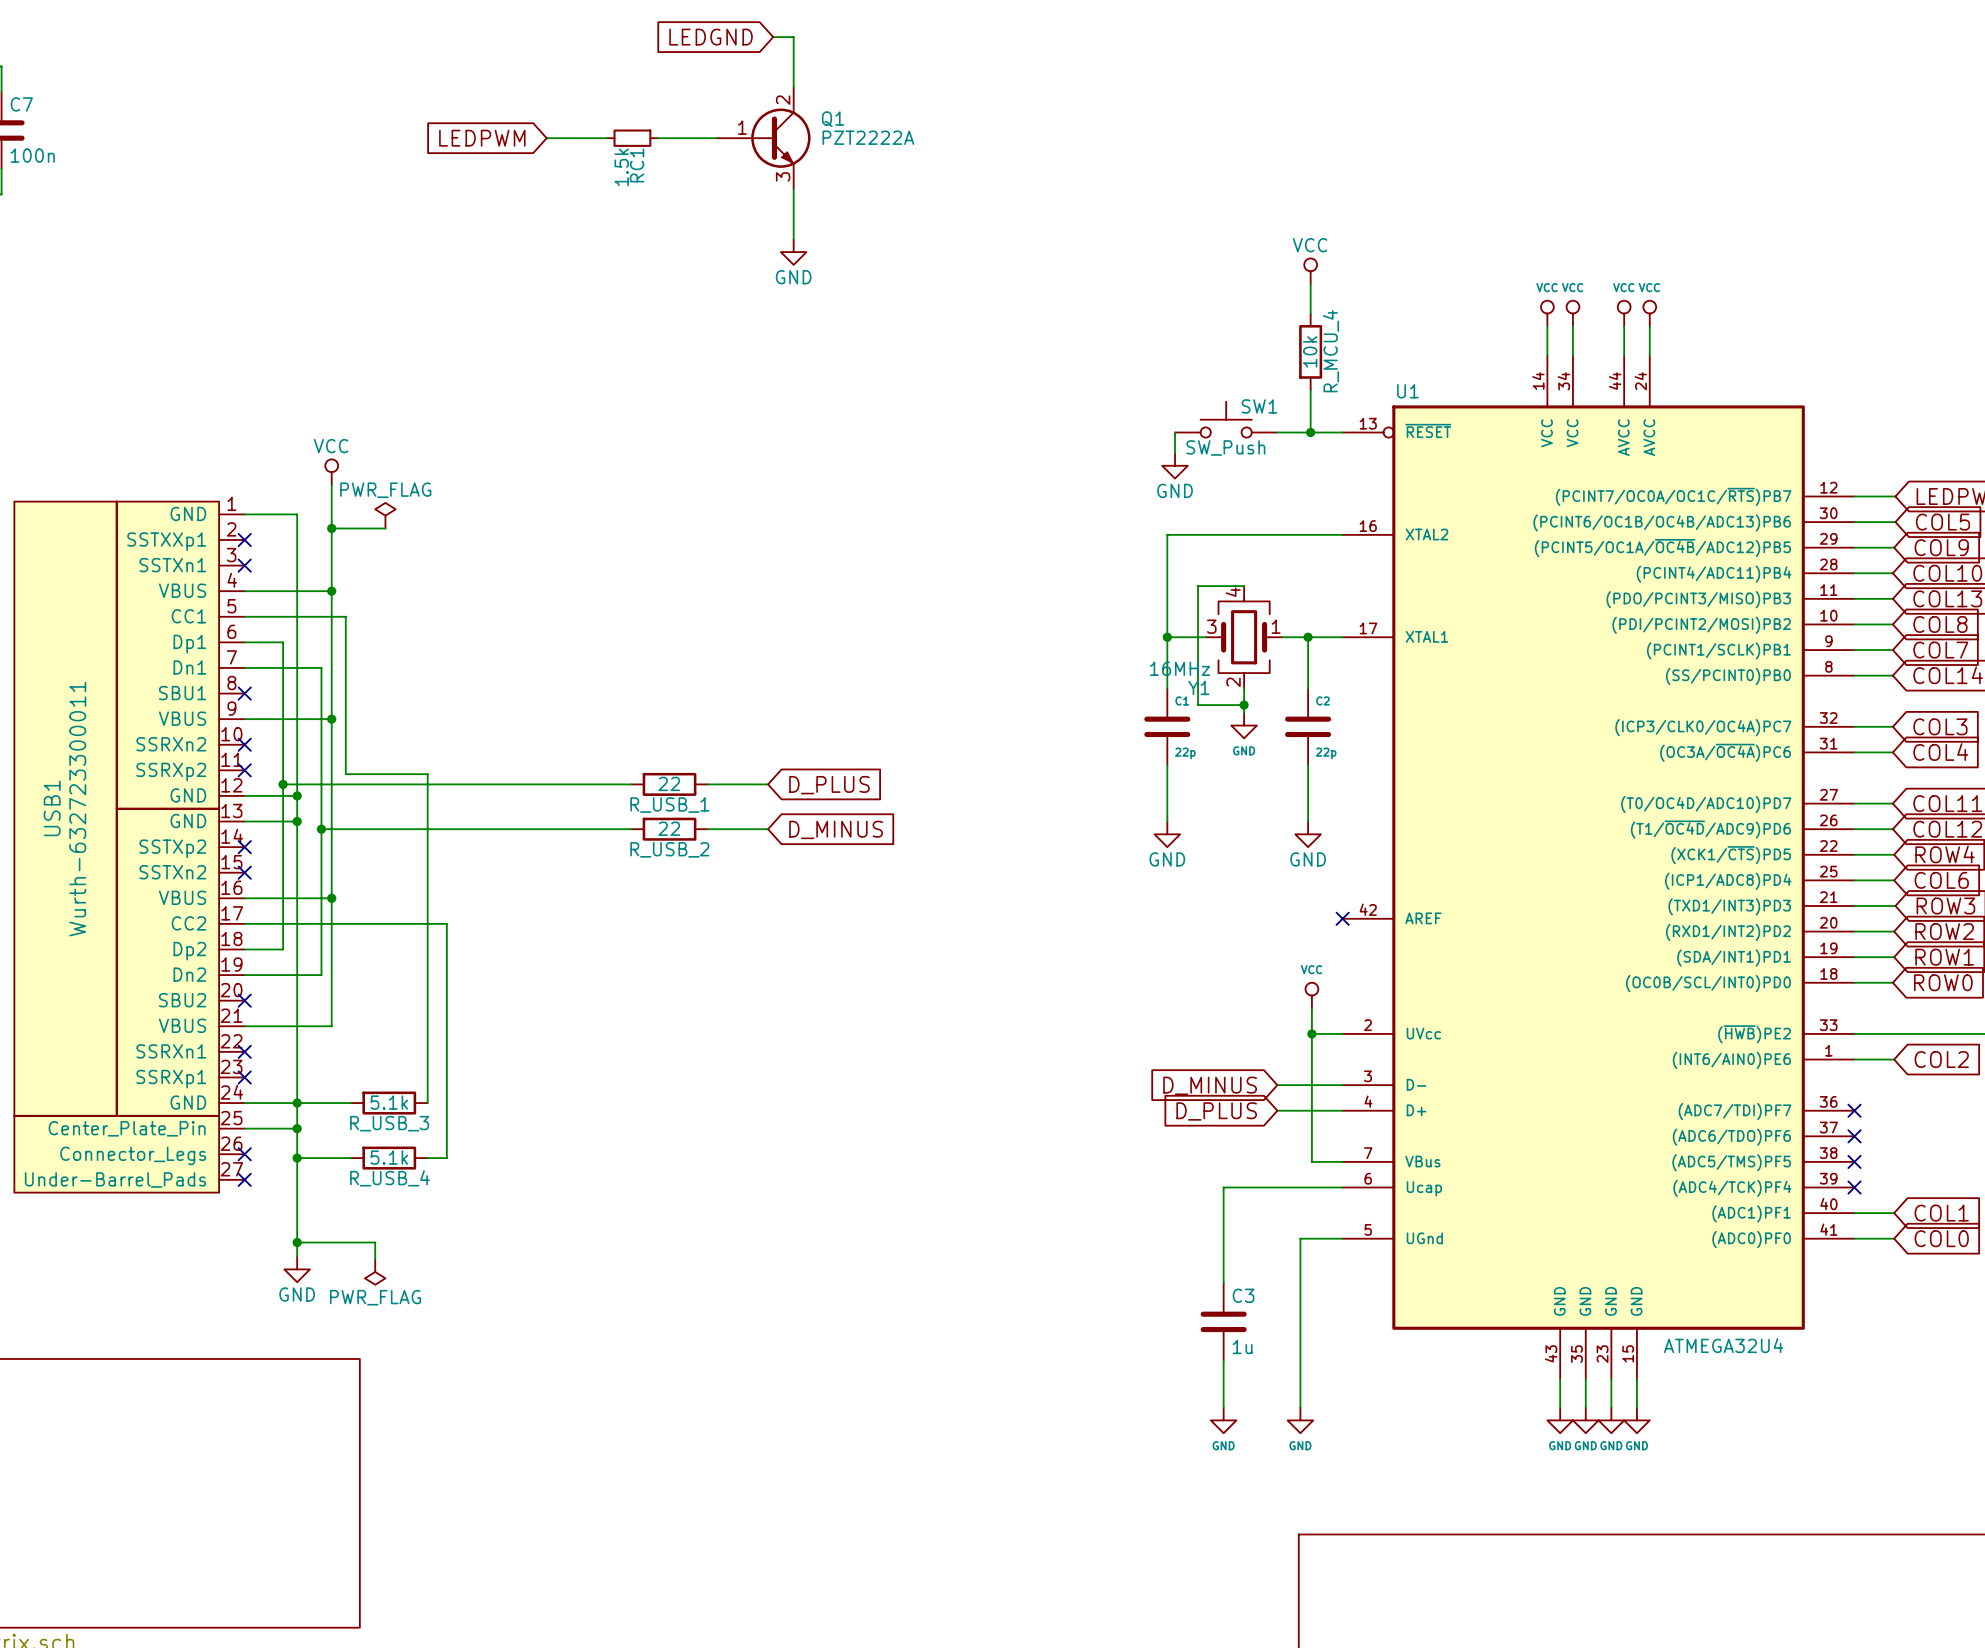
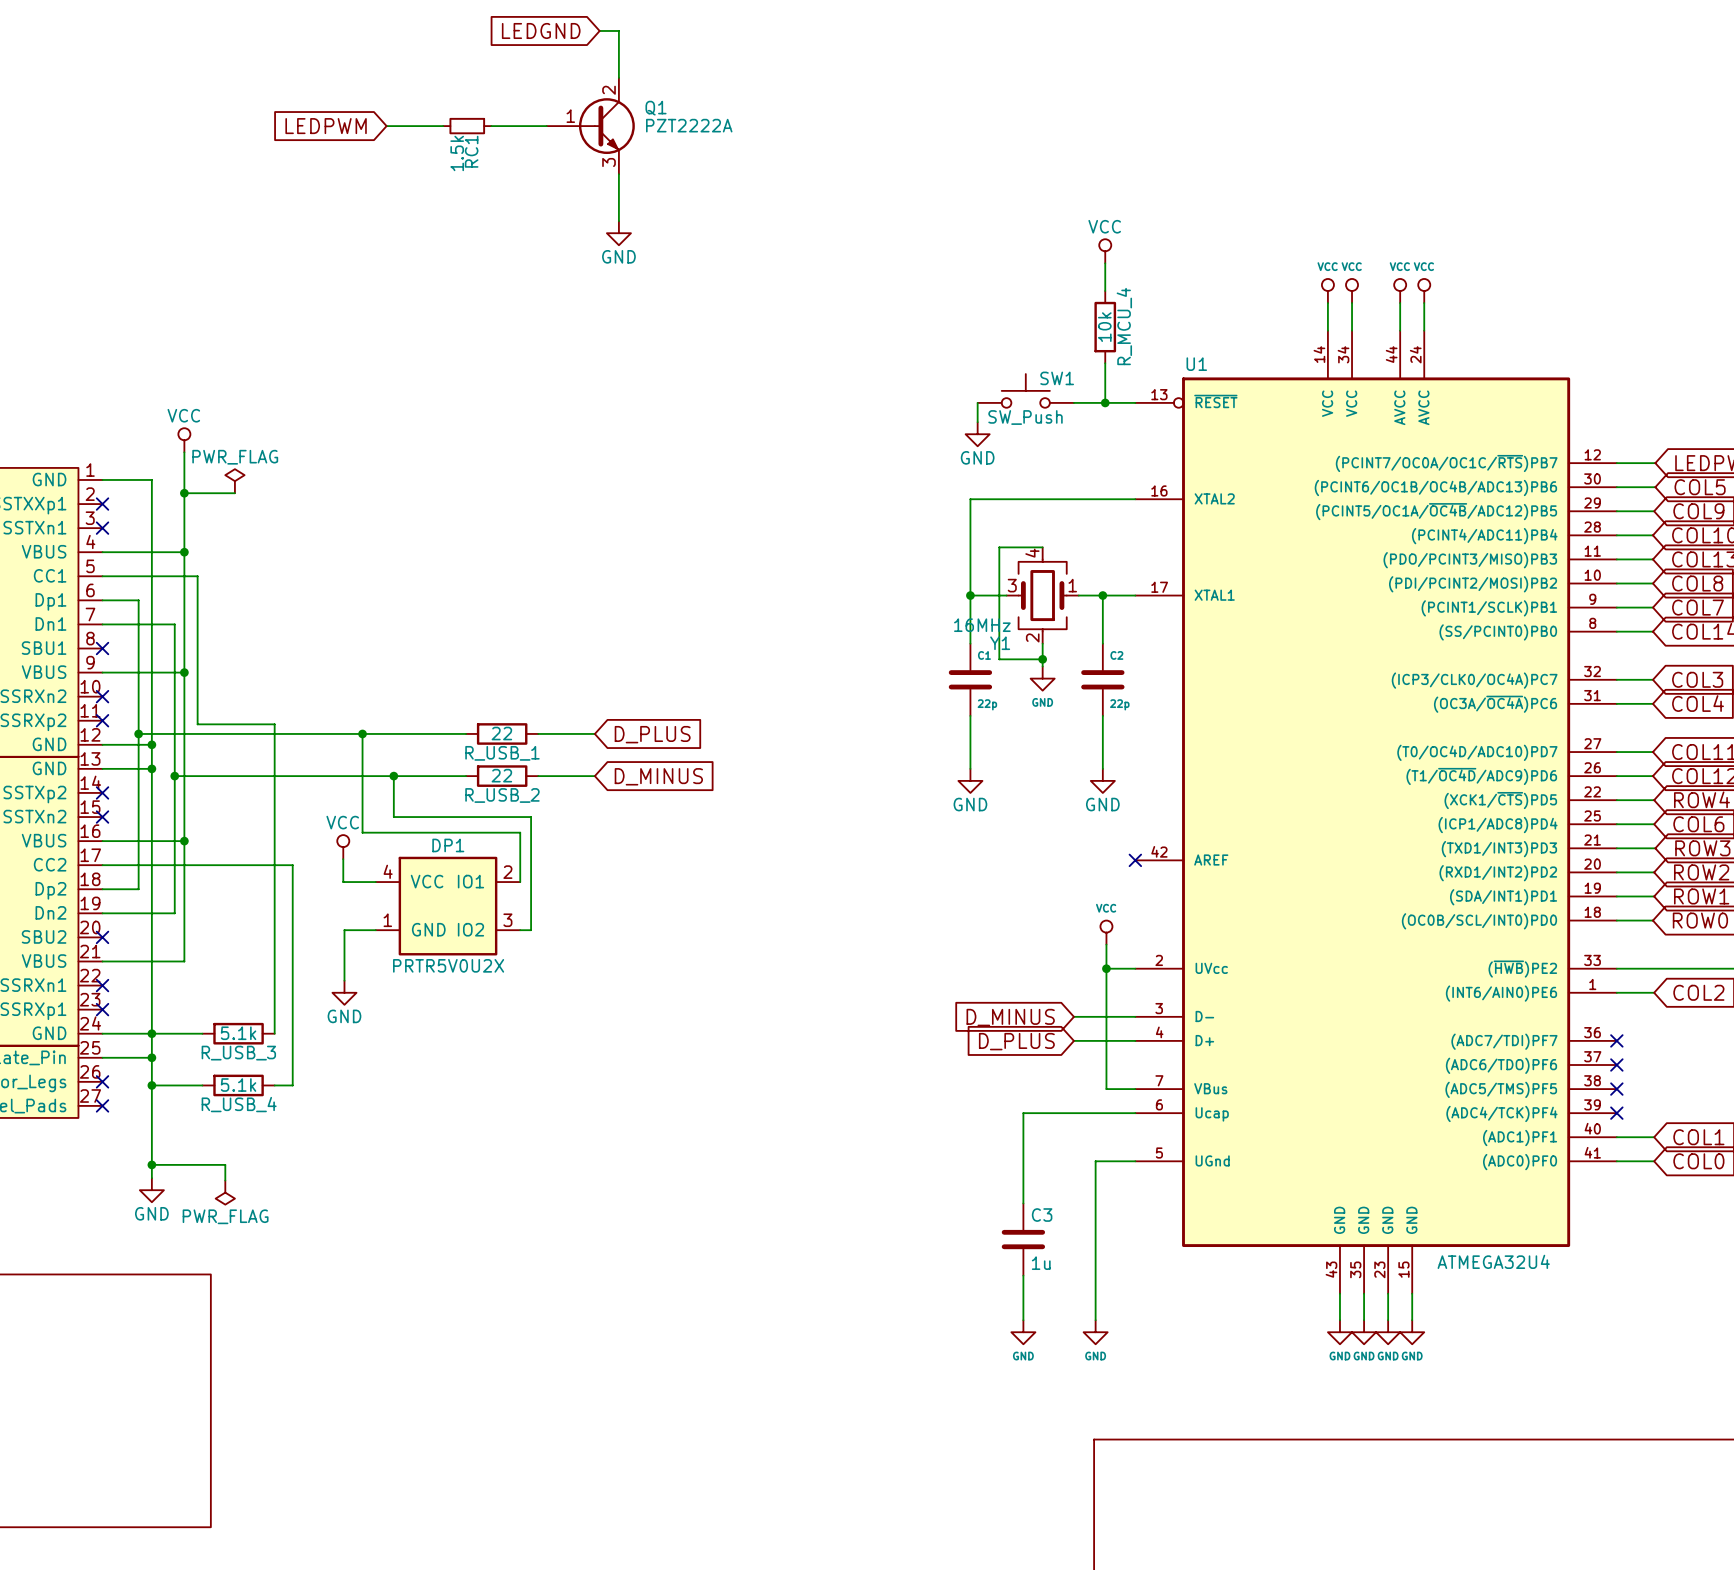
wire: none -> (362, 733) (362, 832) (520, 832) (520, 882)
junction: none -> (362, 733)
wire: none -> (393, 776) (393, 817) (531, 817) (531, 930) (520, 930)
junction: none -> (393, 776)
power symbol: none -> VCC (343, 847)
wire: none -> (343, 859) (343, 882) (375, 882)
DP1: none -> PRTR5V0U2X (448, 906)
wire: none -> (375, 930) (344, 930) (344, 980)
power symbol: none -> GND (344, 992)

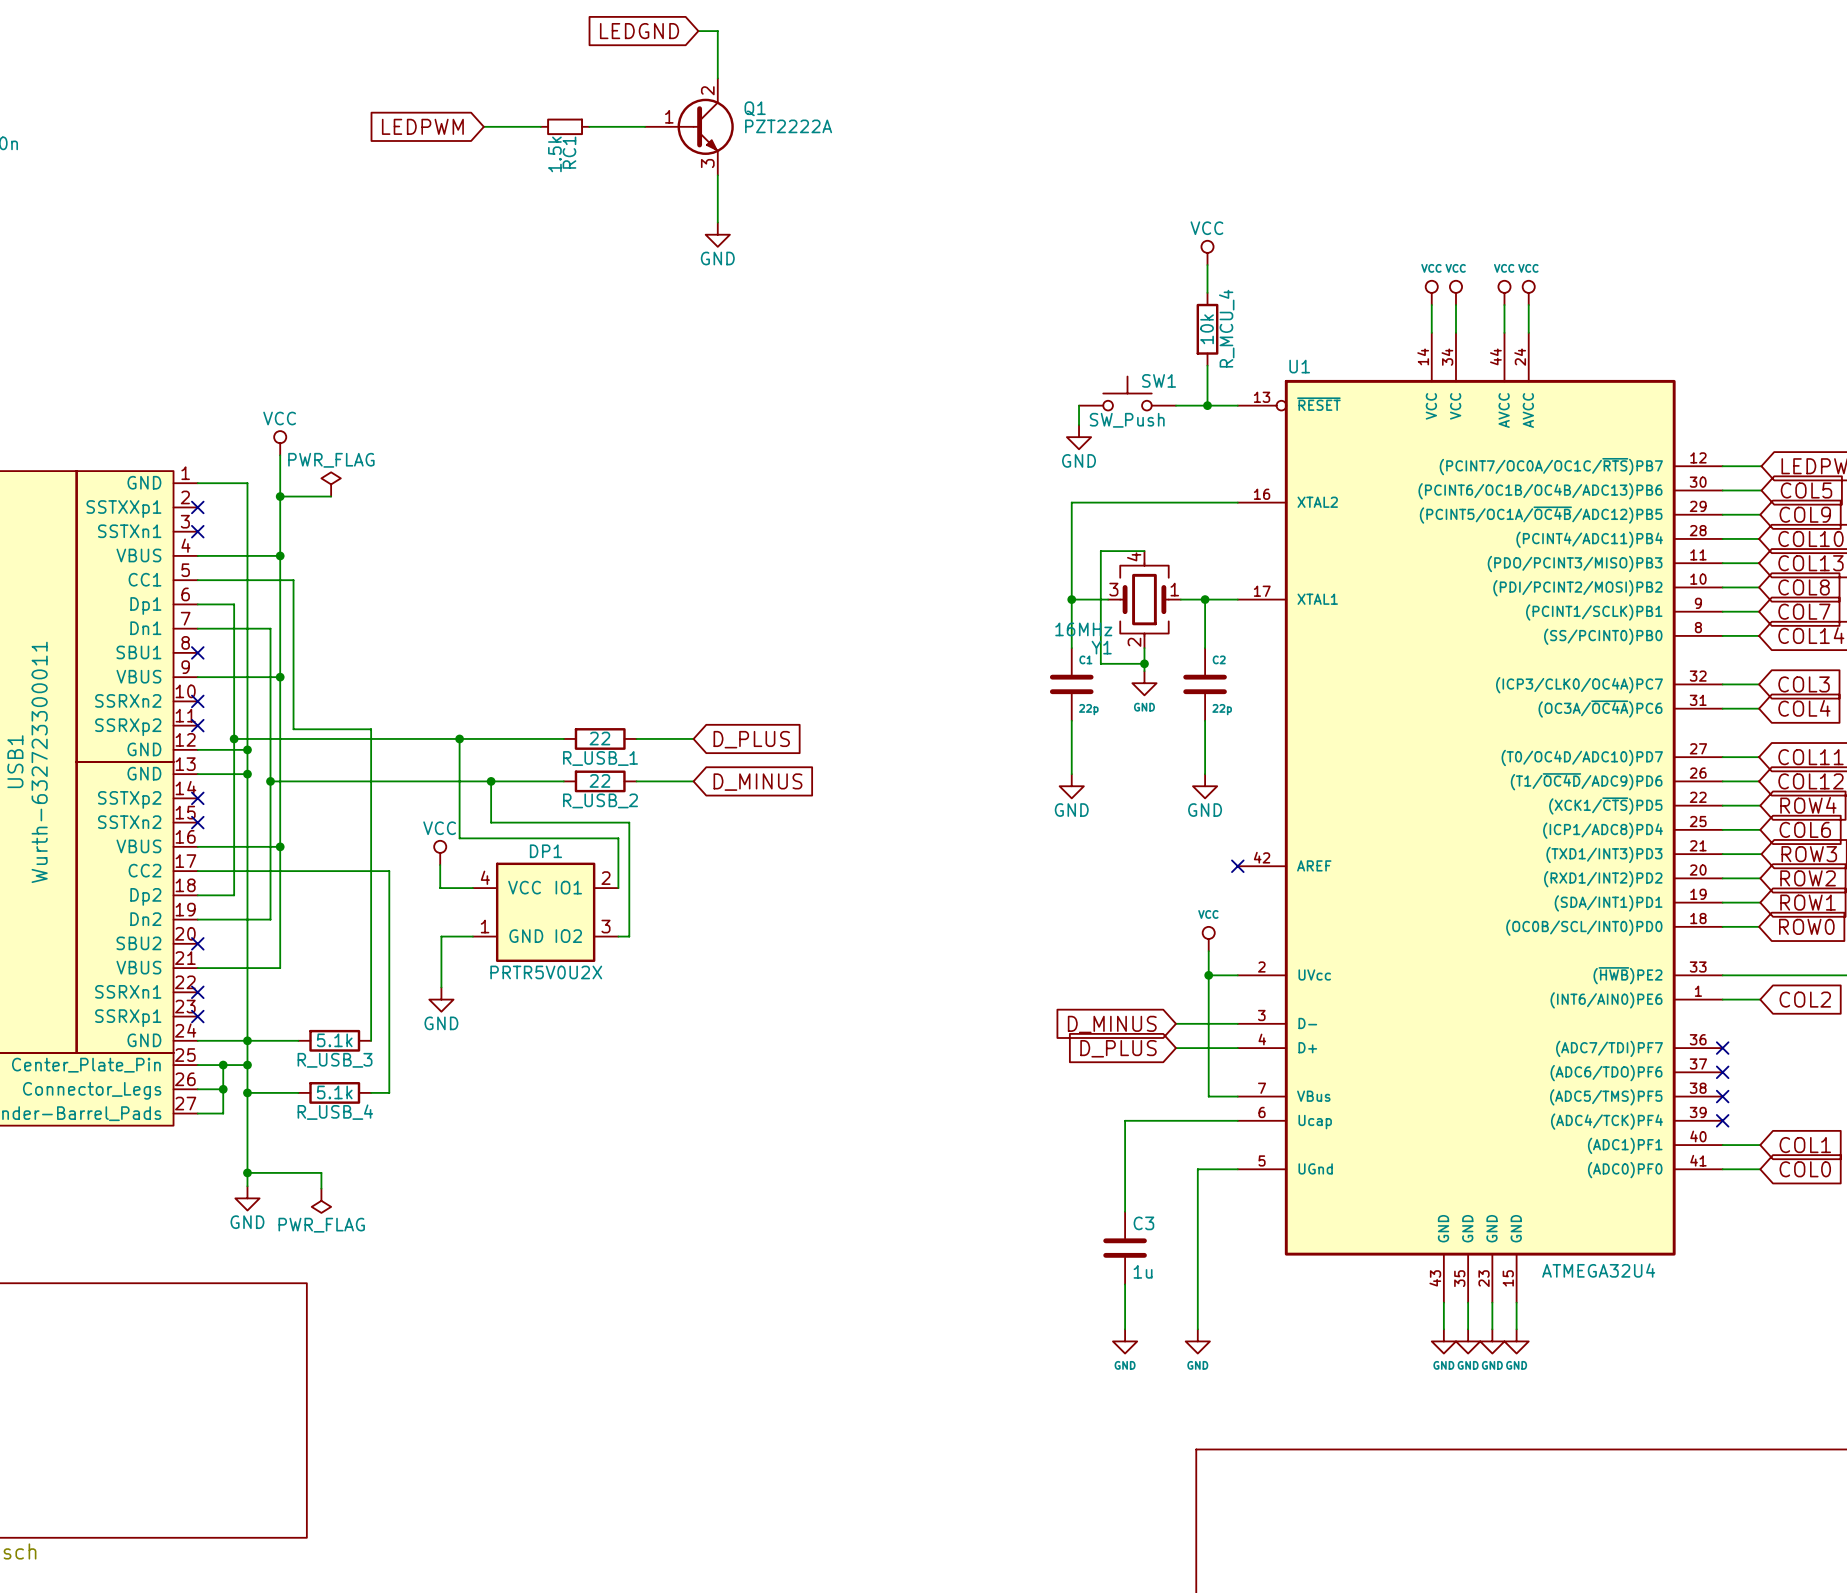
wire: none -> (223, 1065) (223, 1113) (197, 1113)
junction: none -> (223, 1065)
wire: none -> (197, 1089) (223, 1089)
no-connect mark: (102, 1081) -> none
junction: none -> (223, 1089)
no-connect mark: (102, 1105) -> none

